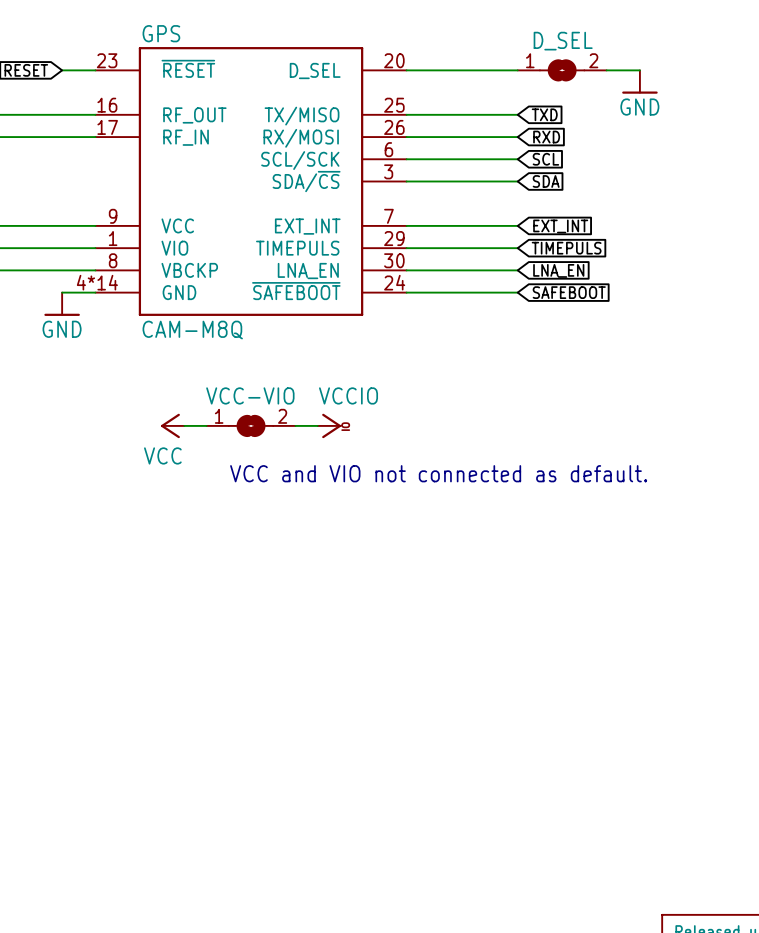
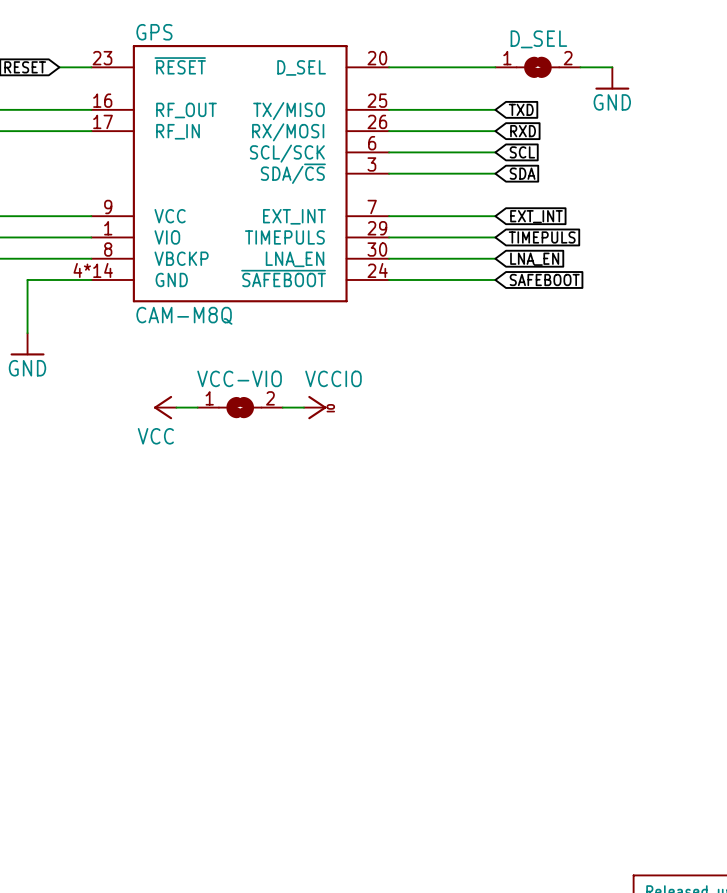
wire: none -> (59, 279) (27, 279) (27, 333)
power symbol position: GND (62, 304) -> GND (27, 344)
text: VCC and VIO not connected as default. (438, 473) -> none

